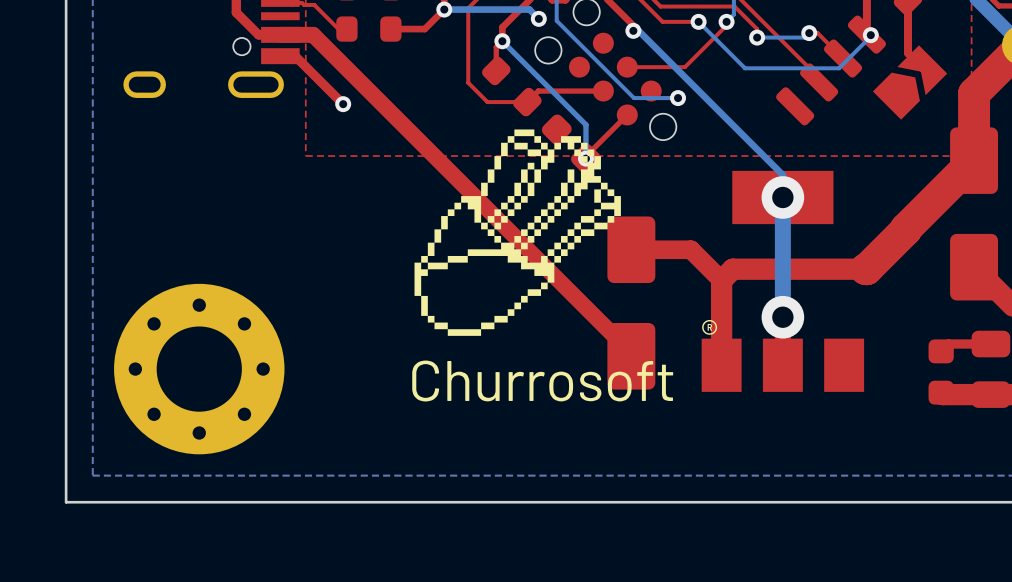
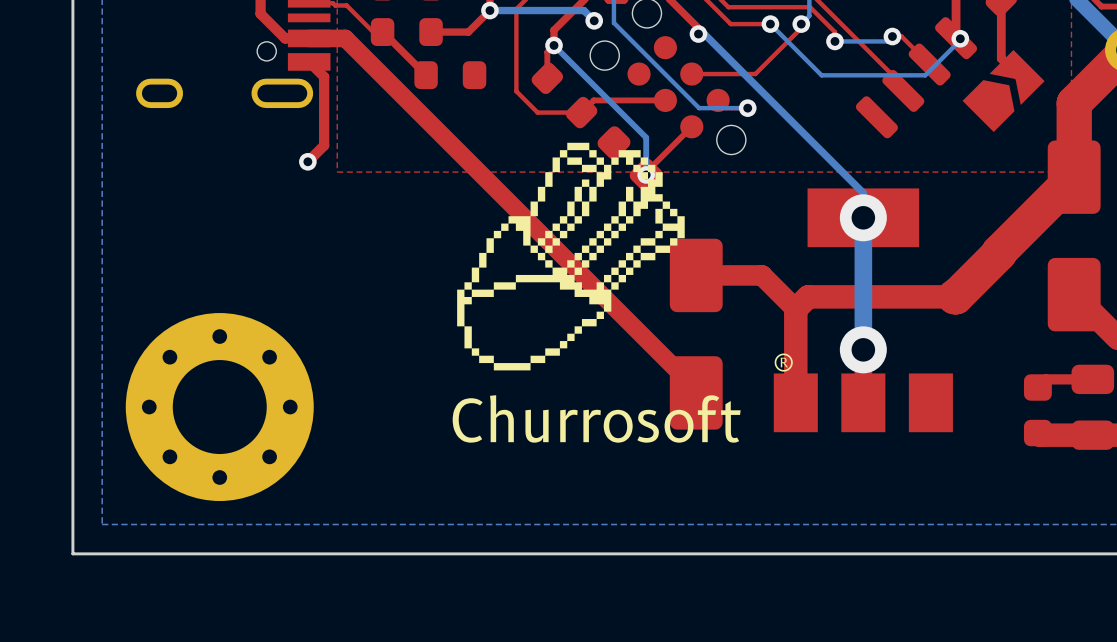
top track: none -> (382, 31) (426, 75)
top track: (280, 56) (295, 56) (343, 104) -> (309, 61) (324, 76) (324, 145) (307, 161)
part: none -> (450, 75)
via position: (343, 104) -> (307, 161)

